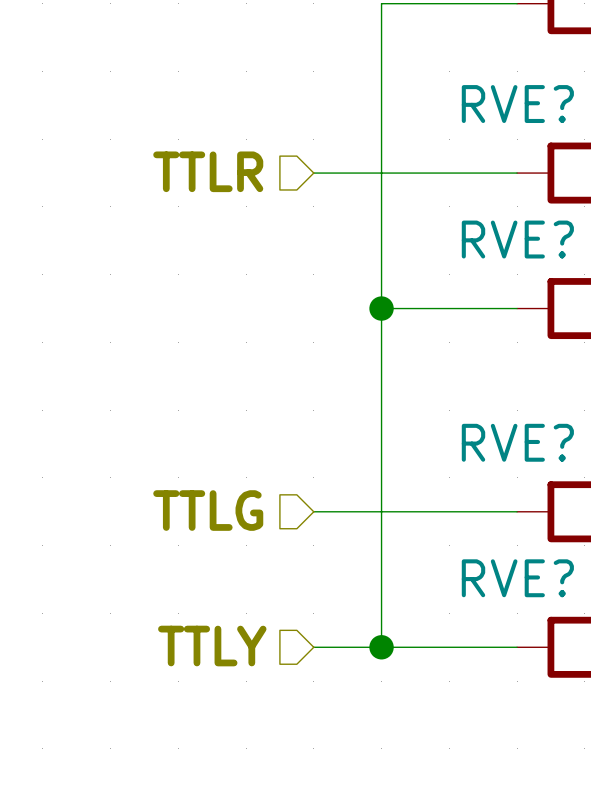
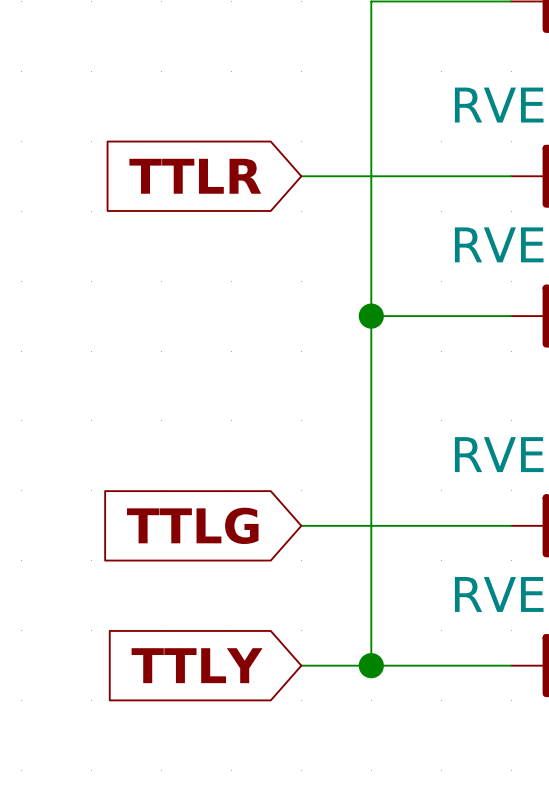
hierarchical label: TTLR (208, 171) -> none
global label: none -> TTLR (195, 176)
hierarchical label: TTLG (208, 510) -> none
global label: none -> TTLG (192, 525)
hierarchical label: TTLY (212, 646) -> none
global label: none -> TTLY (197, 665)

